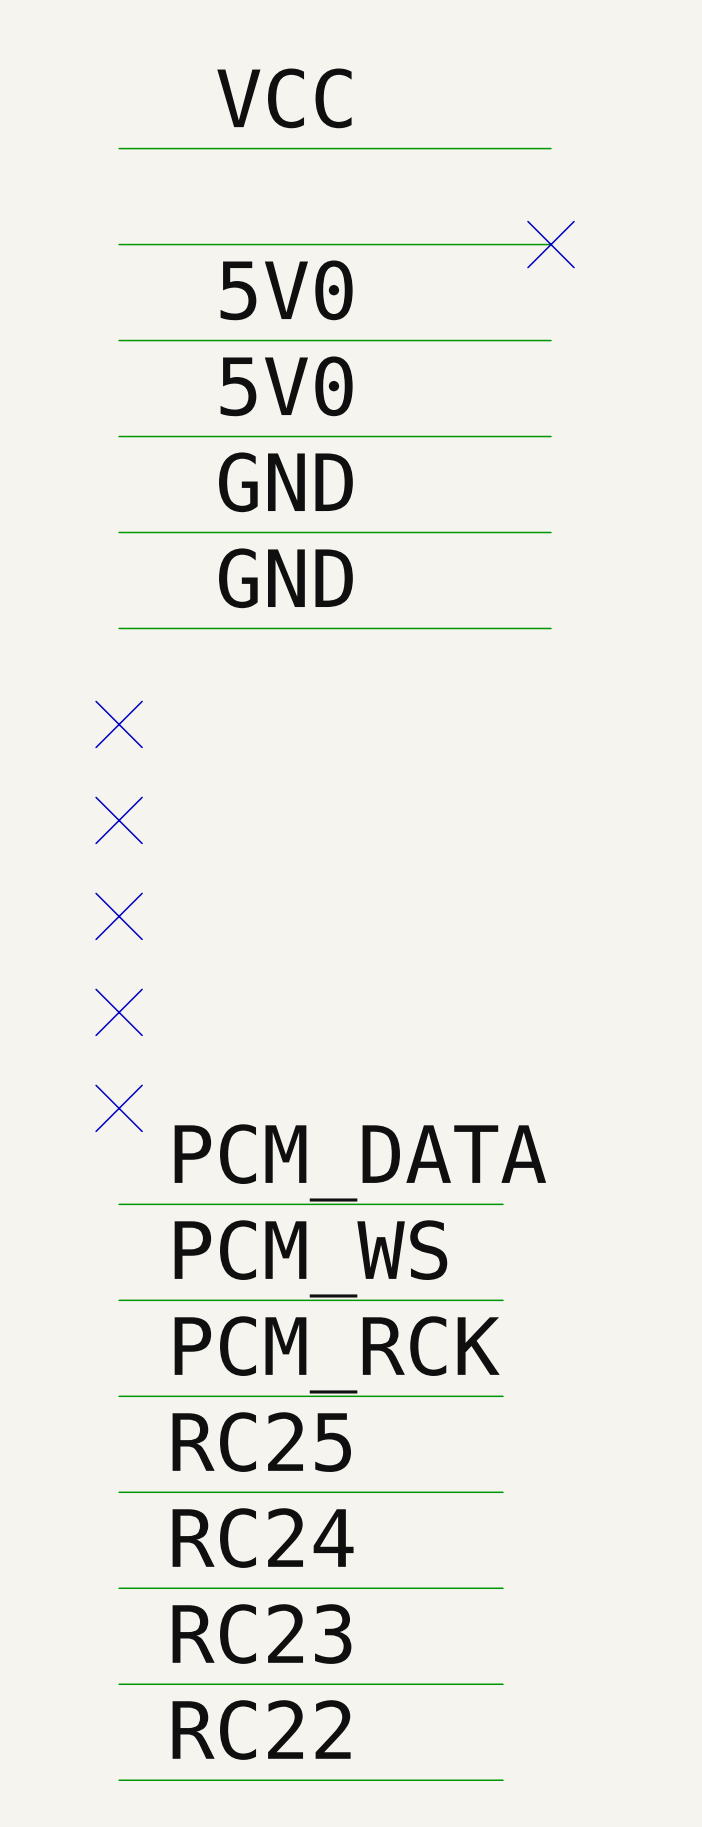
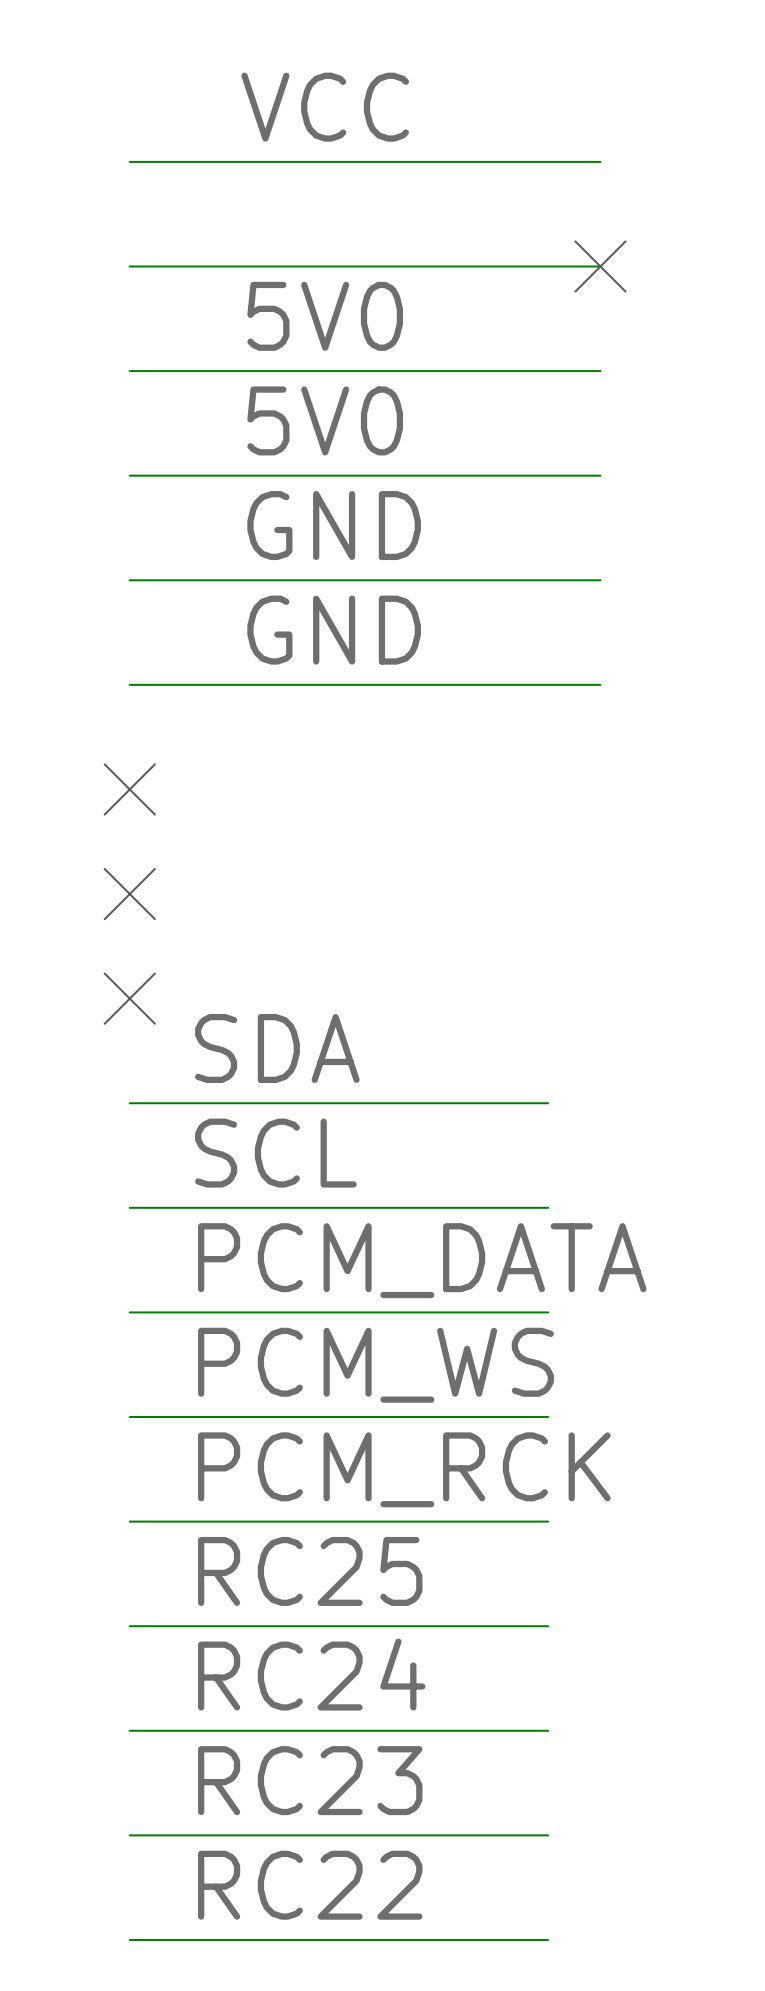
label: none -> SDA (277, 1048)
wire: none -> (129, 1103) (548, 1103)
no-connect mark: (119, 1012) -> none
label: none -> SCL (275, 1153)
wire: none -> (129, 1207) (548, 1207)
no-connect mark: (119, 1108) -> none

